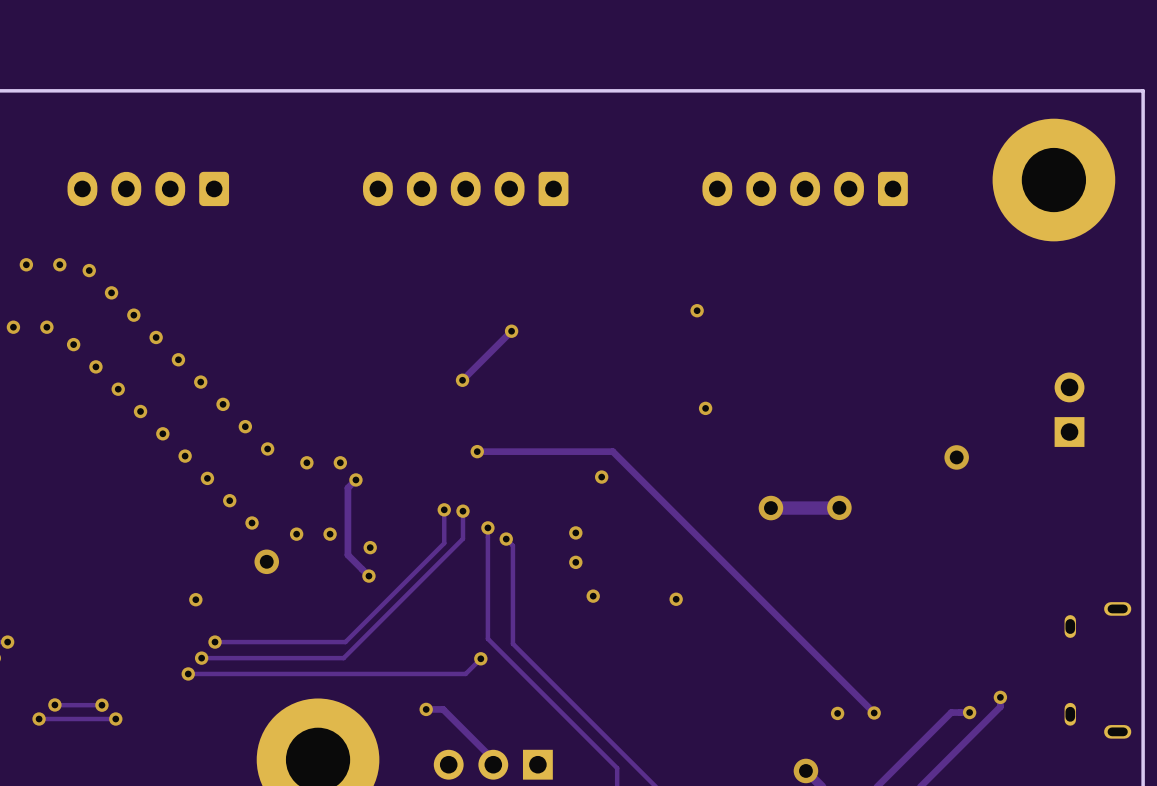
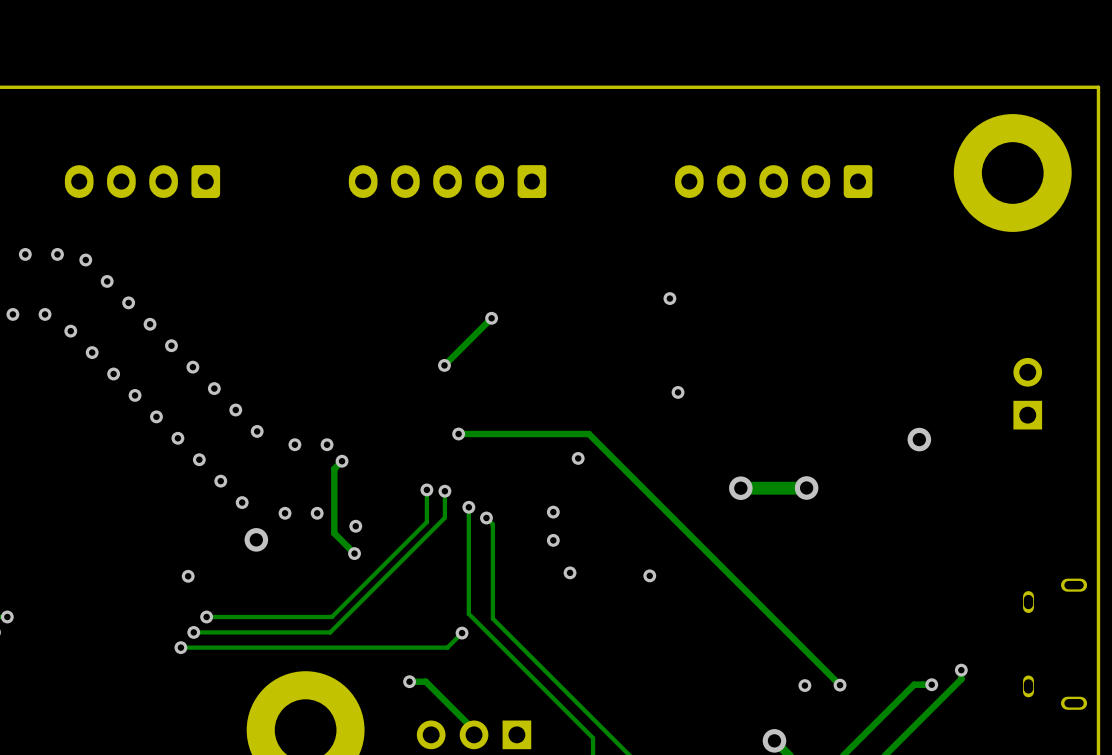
via: (54, 704) -> none
track: (101, 705) (55, 705) -> none
via: (101, 705) -> none
via: (39, 719) -> none
track: (115, 719) (39, 719) -> none
via: (115, 719) -> none

